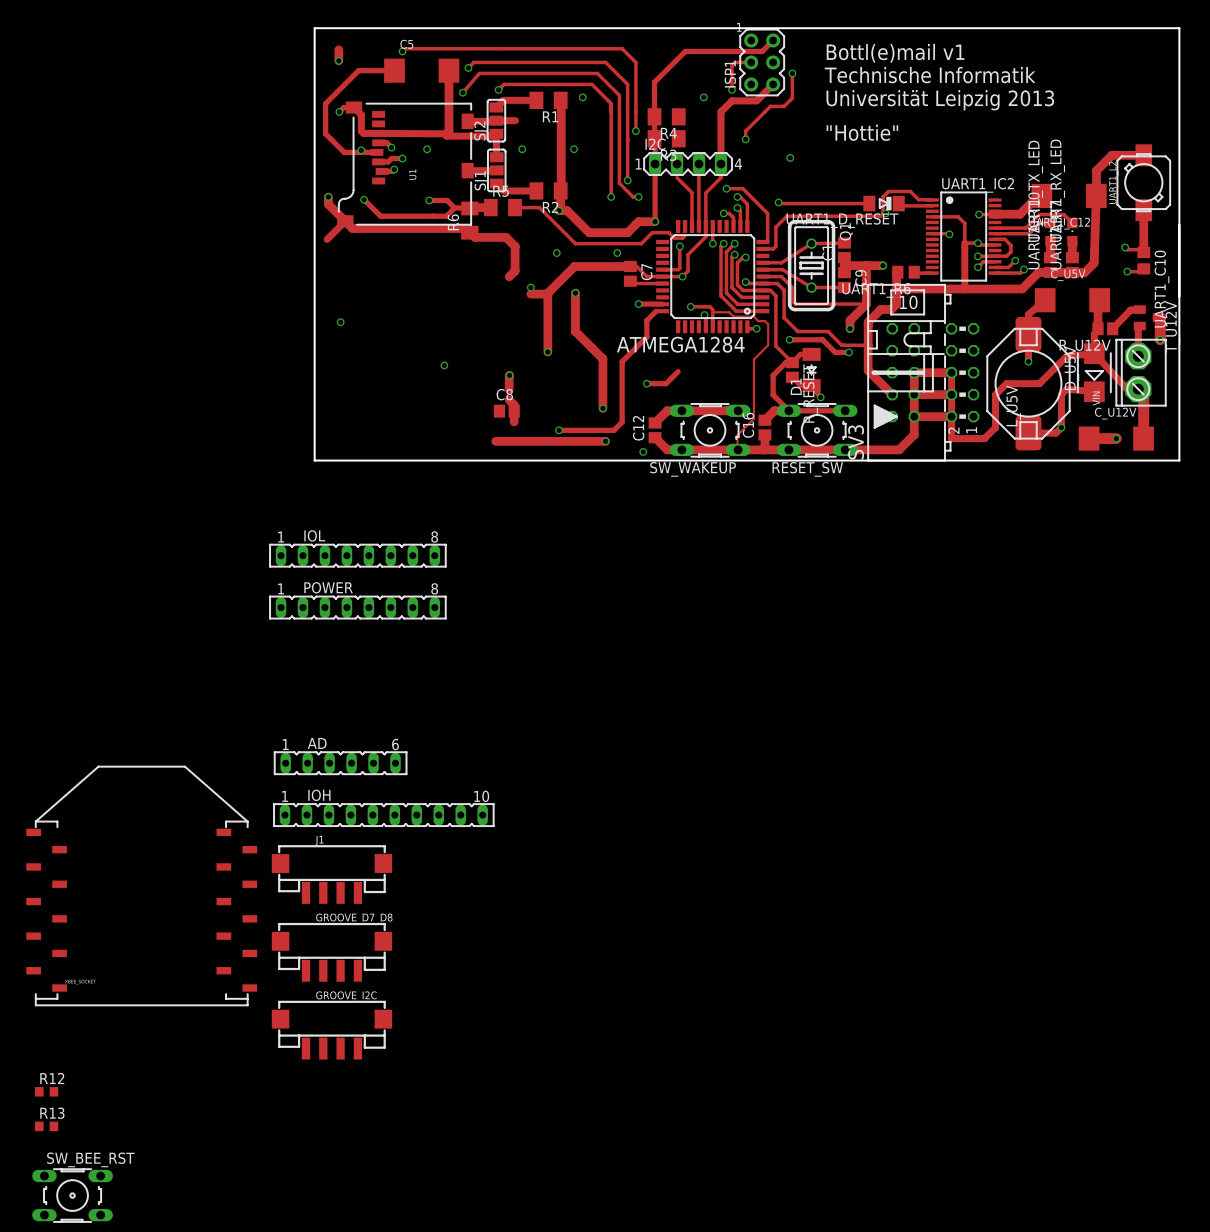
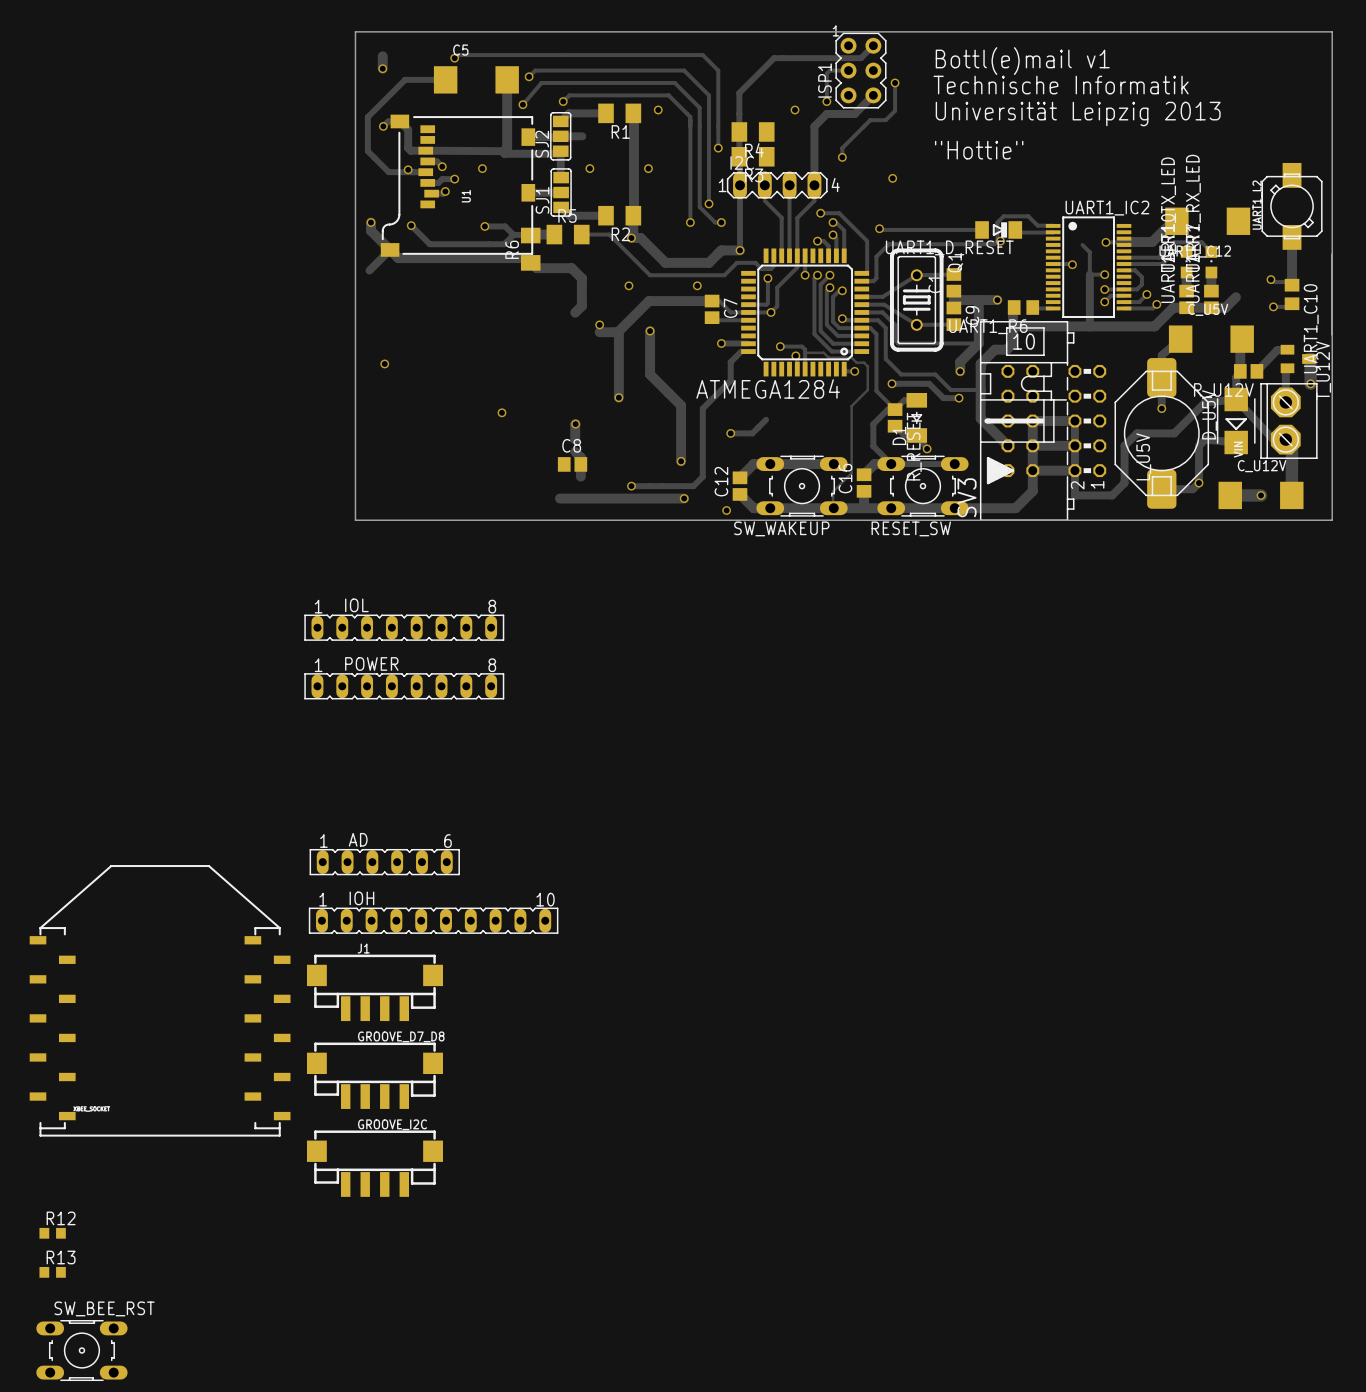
track: (1143, 155) (1111, 155) (1096, 170) (1094, 263) -> none
track: (932, 216) (958, 216) -> none
track: (979, 244) (995, 244) -> none

